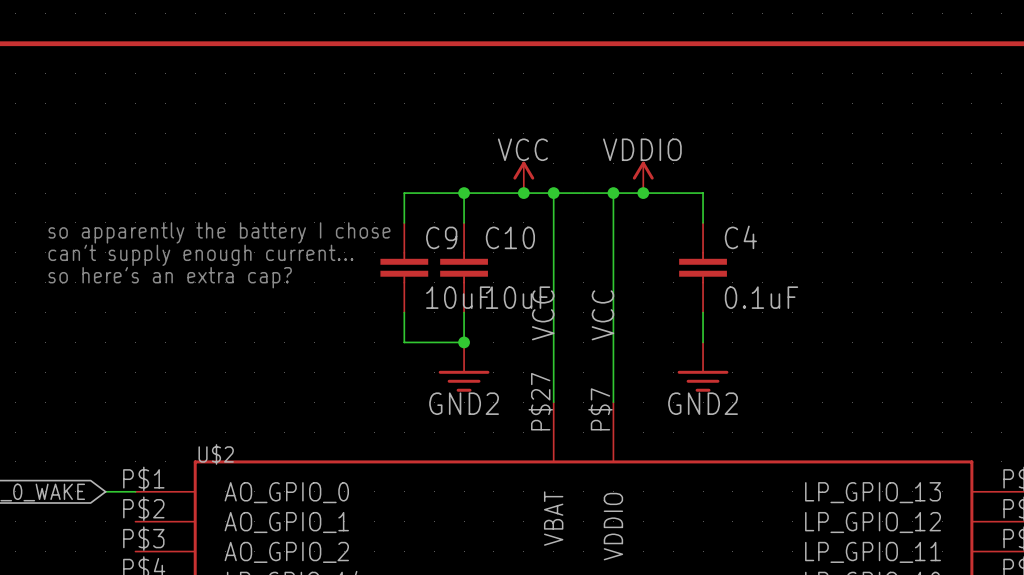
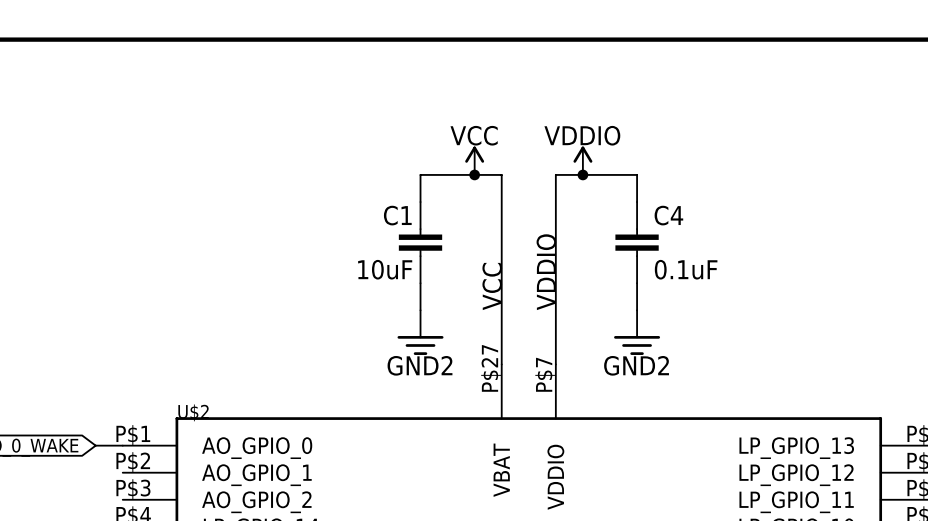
wire: (464, 193) (404, 193) (404, 222) -> none
junction: (464, 193) -> none
wire: (553, 193) (613, 193) -> none
junction: (553, 193) -> none
junction: (613, 193) -> none
text: so apparently the battery I chose (219, 232) -> none
C10 name: C10 (510, 237) -> C1 (397, 215)
text: can't supply enough current... (200, 255) -> none
C9: 10uF (404, 267) -> none
text: so here's an extra cap? (170, 277) -> none
C10 value position: 10uF (518, 297) -> 10uF (385, 269)
wire: (404, 312) (404, 342) (464, 342) -> none
label: VCC (602, 315) -> VDDIO (546, 272)
junction: (464, 342) -> none

